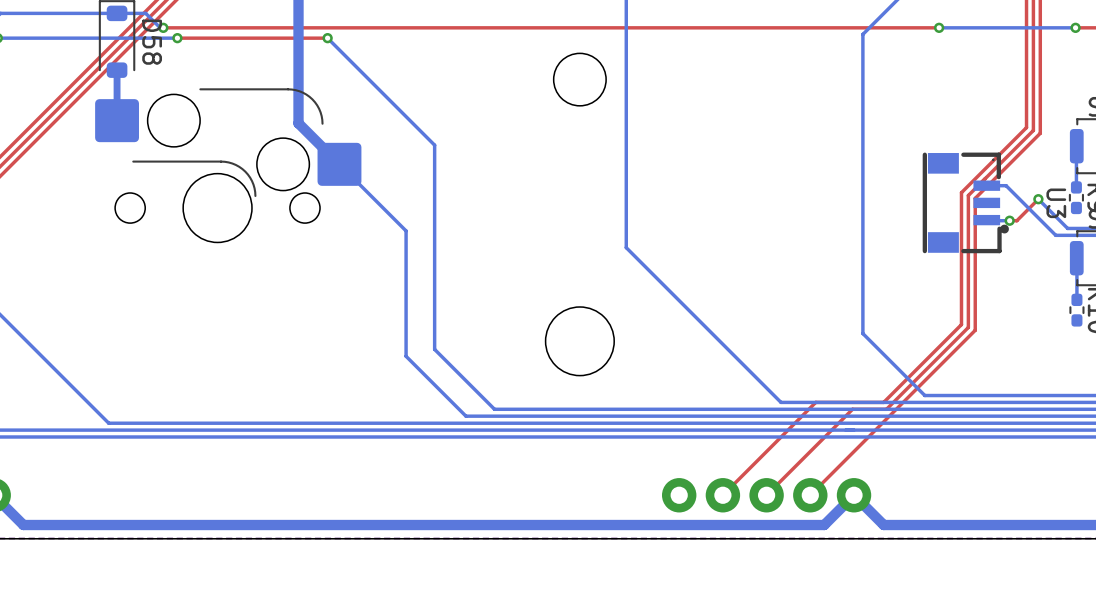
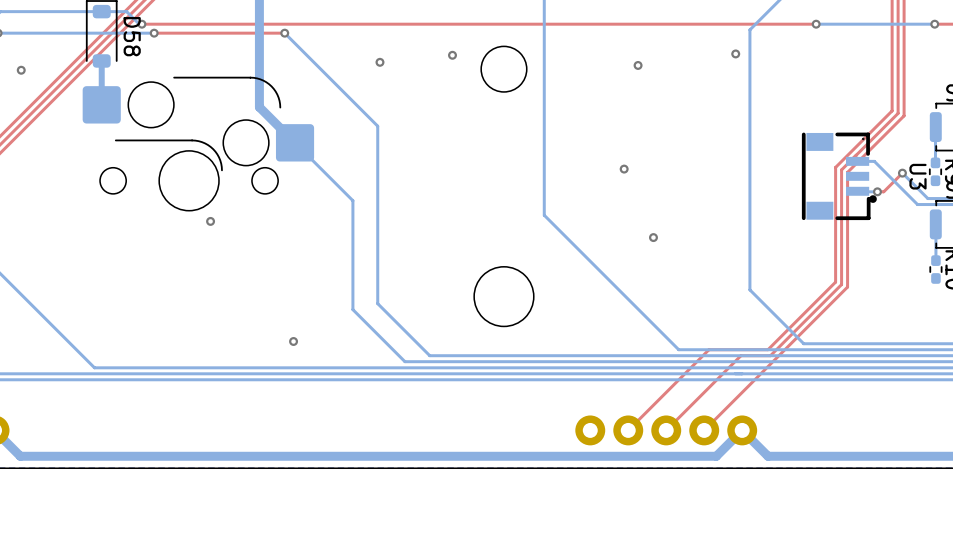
via: none -> (735, 53)
via: none -> (452, 55)
via: none -> (379, 62)
via: none -> (638, 65)
via: none -> (21, 70)
via: none -> (624, 169)
via: none -> (210, 221)
via: none -> (653, 237)
via: none -> (293, 341)

